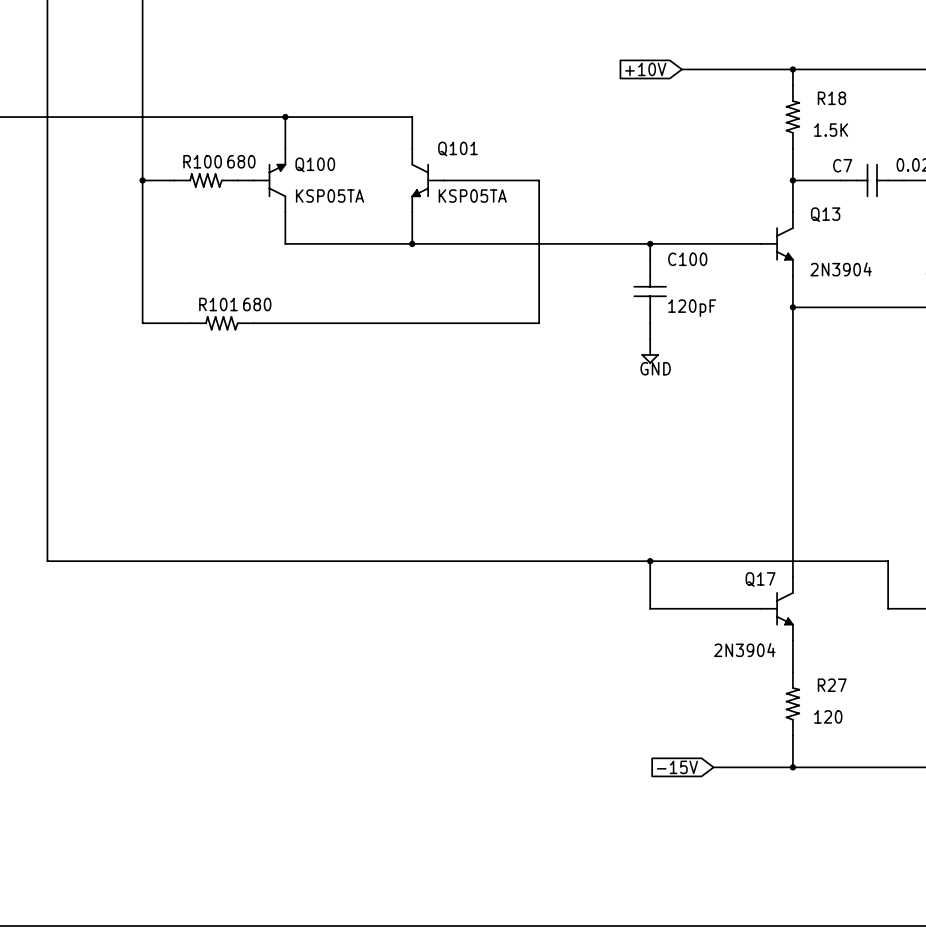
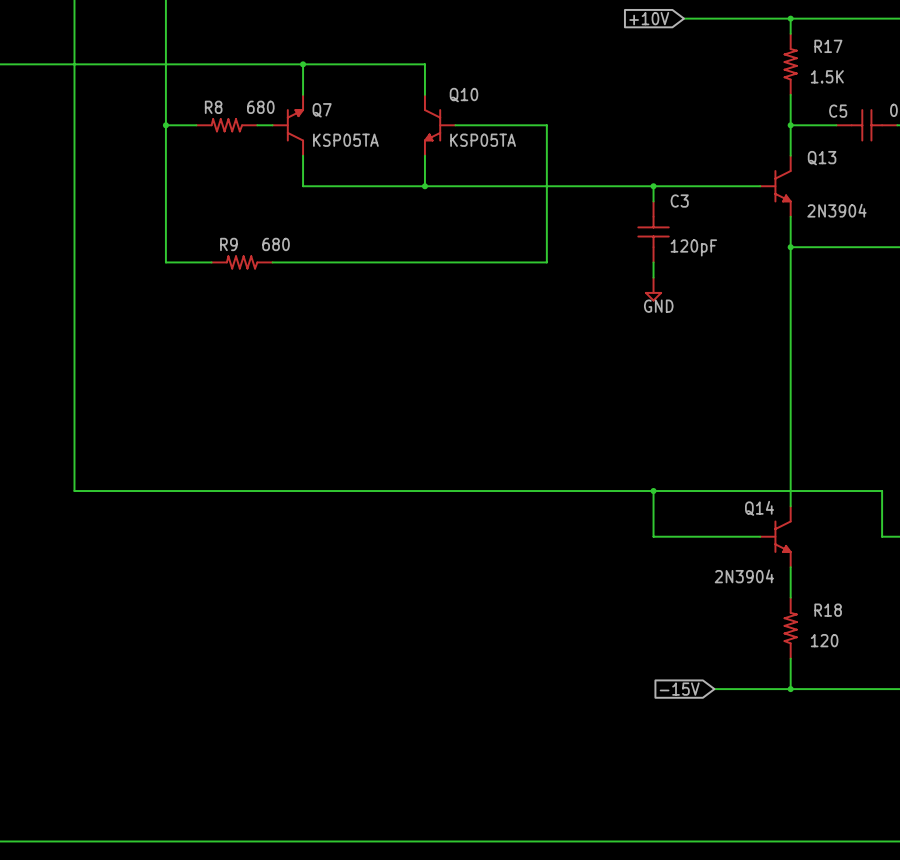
R18 name: R18 (831, 98) -> R17 (828, 46)
Q101 name: Q101 (458, 149) -> Q10 (463, 95)
R100 name: R100 (202, 161) -> R8 (213, 107)
Q100 name: Q100 (315, 164) -> Q7 (322, 110)
C7 name: C7 (842, 165) -> C5 (838, 111)
C100 name: C100 (687, 259) -> C3 (679, 201)
R101 name: R101 (218, 304) -> R9 (228, 244)
Q17 name: Q17 (760, 579) -> Q14 (759, 508)
R27 name: R27 (832, 685) -> R18 (828, 610)

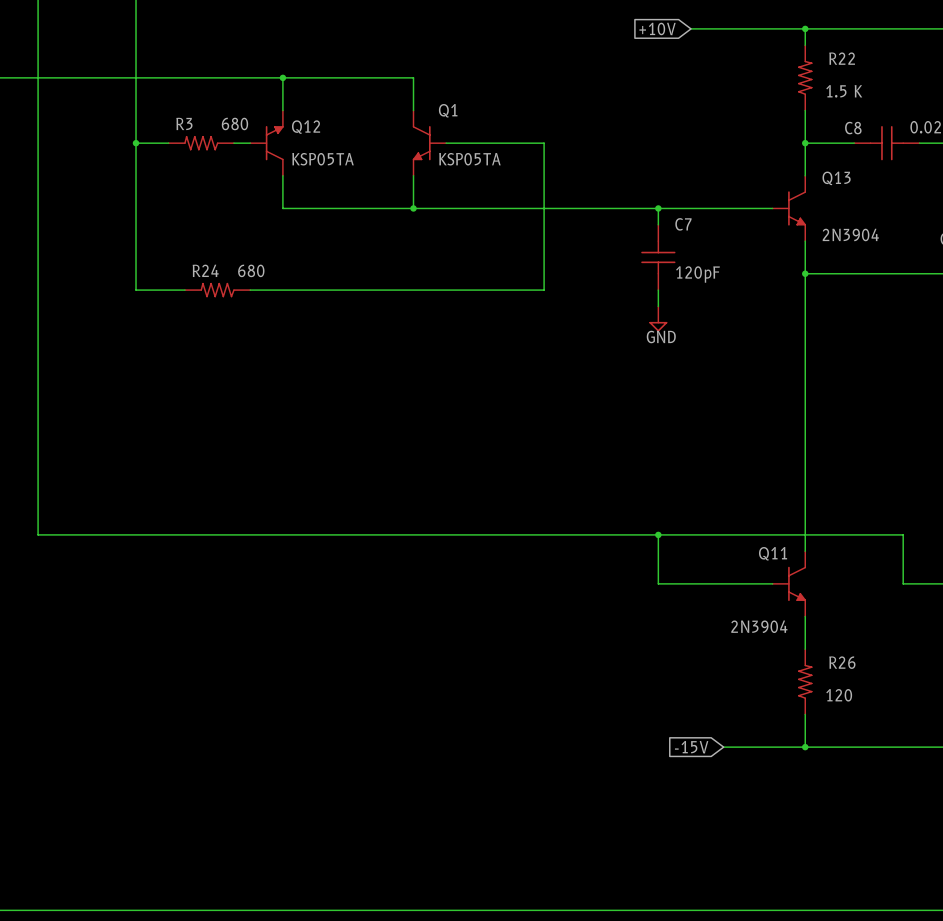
R17 name: R17 (828, 46) -> R22 (842, 58)
R17 value: 1.5K (827, 76) -> 1.5 K (844, 91)
Q10 name: Q10 (463, 95) -> Q1 (448, 110)
R8 name: R8 (213, 107) -> R3 (184, 123)
Q7 name: Q7 (322, 110) -> Q12 (306, 127)
C5 name: C5 (838, 111) -> C8 (853, 128)
C3 name: C3 (679, 201) -> C7 (683, 224)
R9 name: R9 (228, 244) -> R24 (205, 270)
Q14 name: Q14 (759, 508) -> Q11 (773, 553)
R18 name: R18 (828, 610) -> R26 (842, 662)

